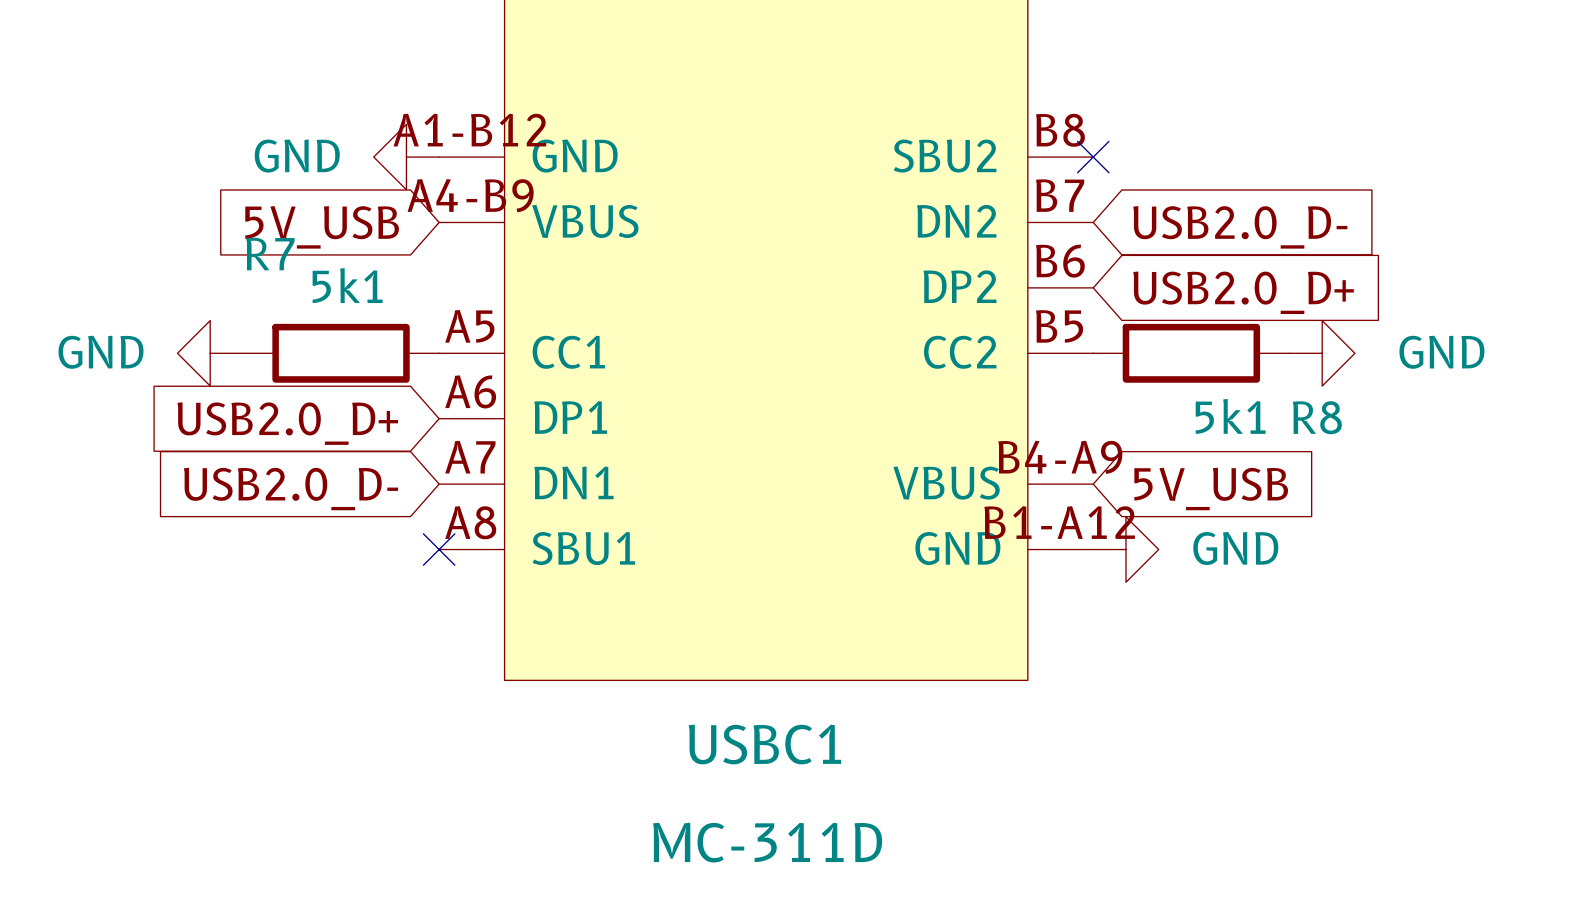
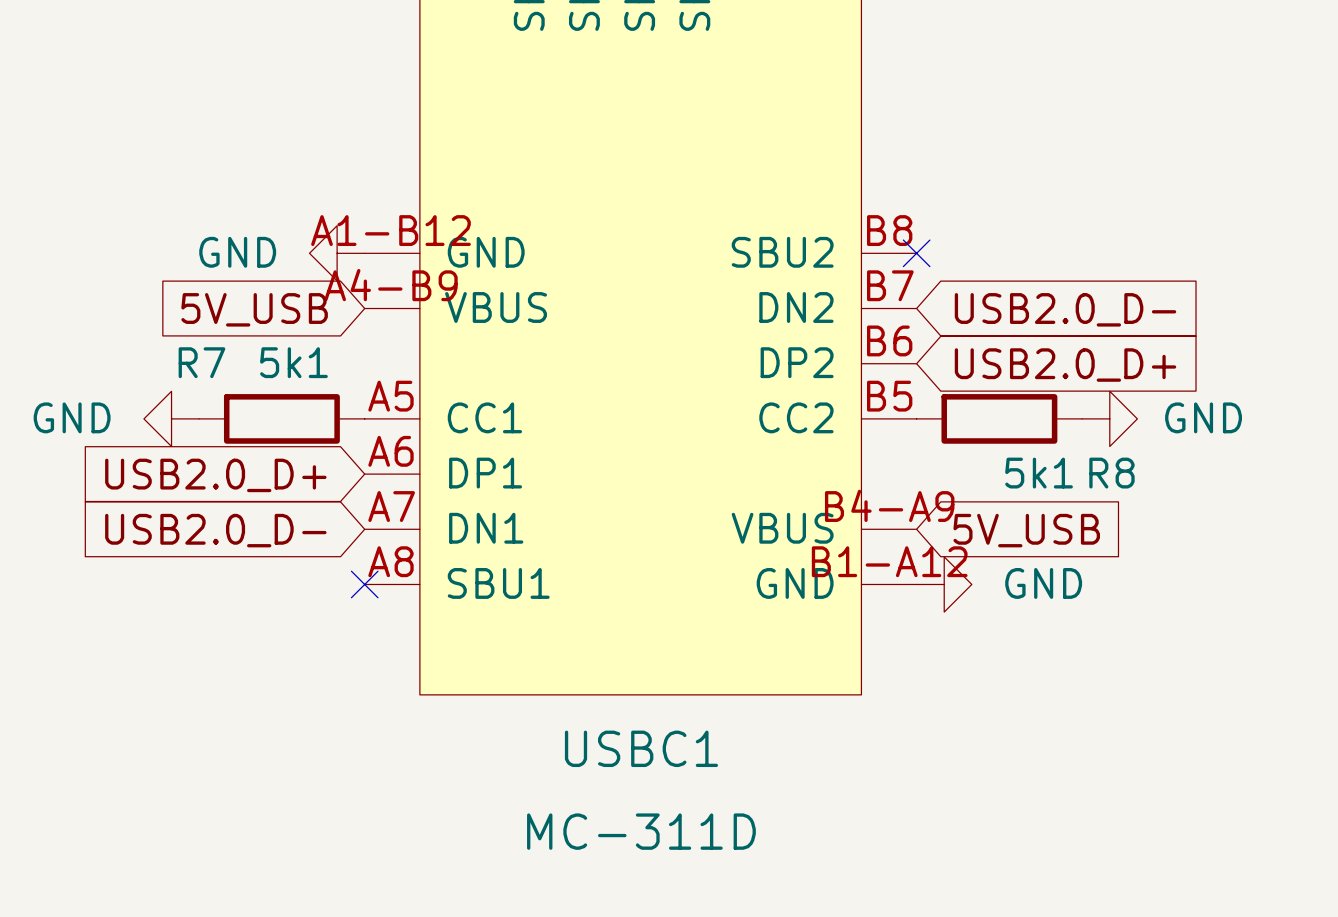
R7 name position: R7 (270, 254) -> R7 (201, 362)

